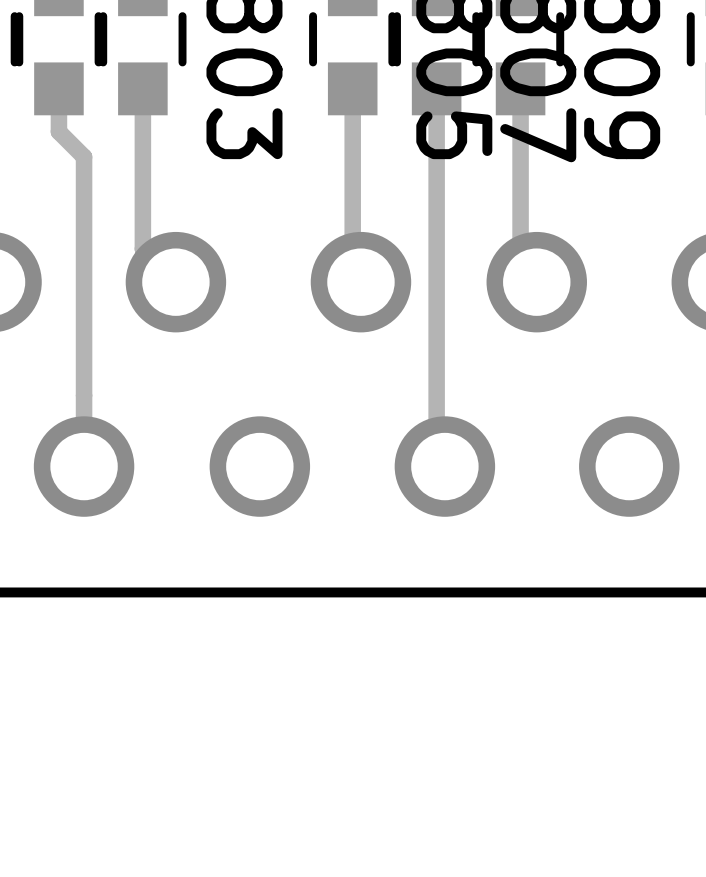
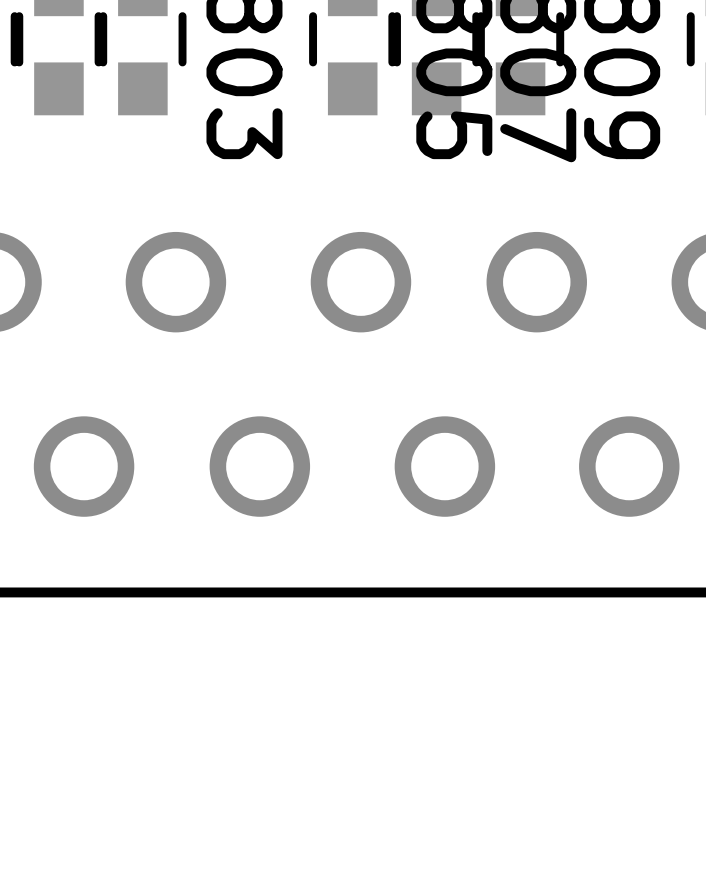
track: (58, 88) (58, 131) (84, 156) (84, 466) -> none
track: (142, 88) (142, 249) (175, 282) -> none
track: (352, 88) (352, 273) (360, 282) -> none
track: (436, 88) (436, 458) (444, 466) -> none
track: (520, 88) (520, 265) (536, 282) -> none

